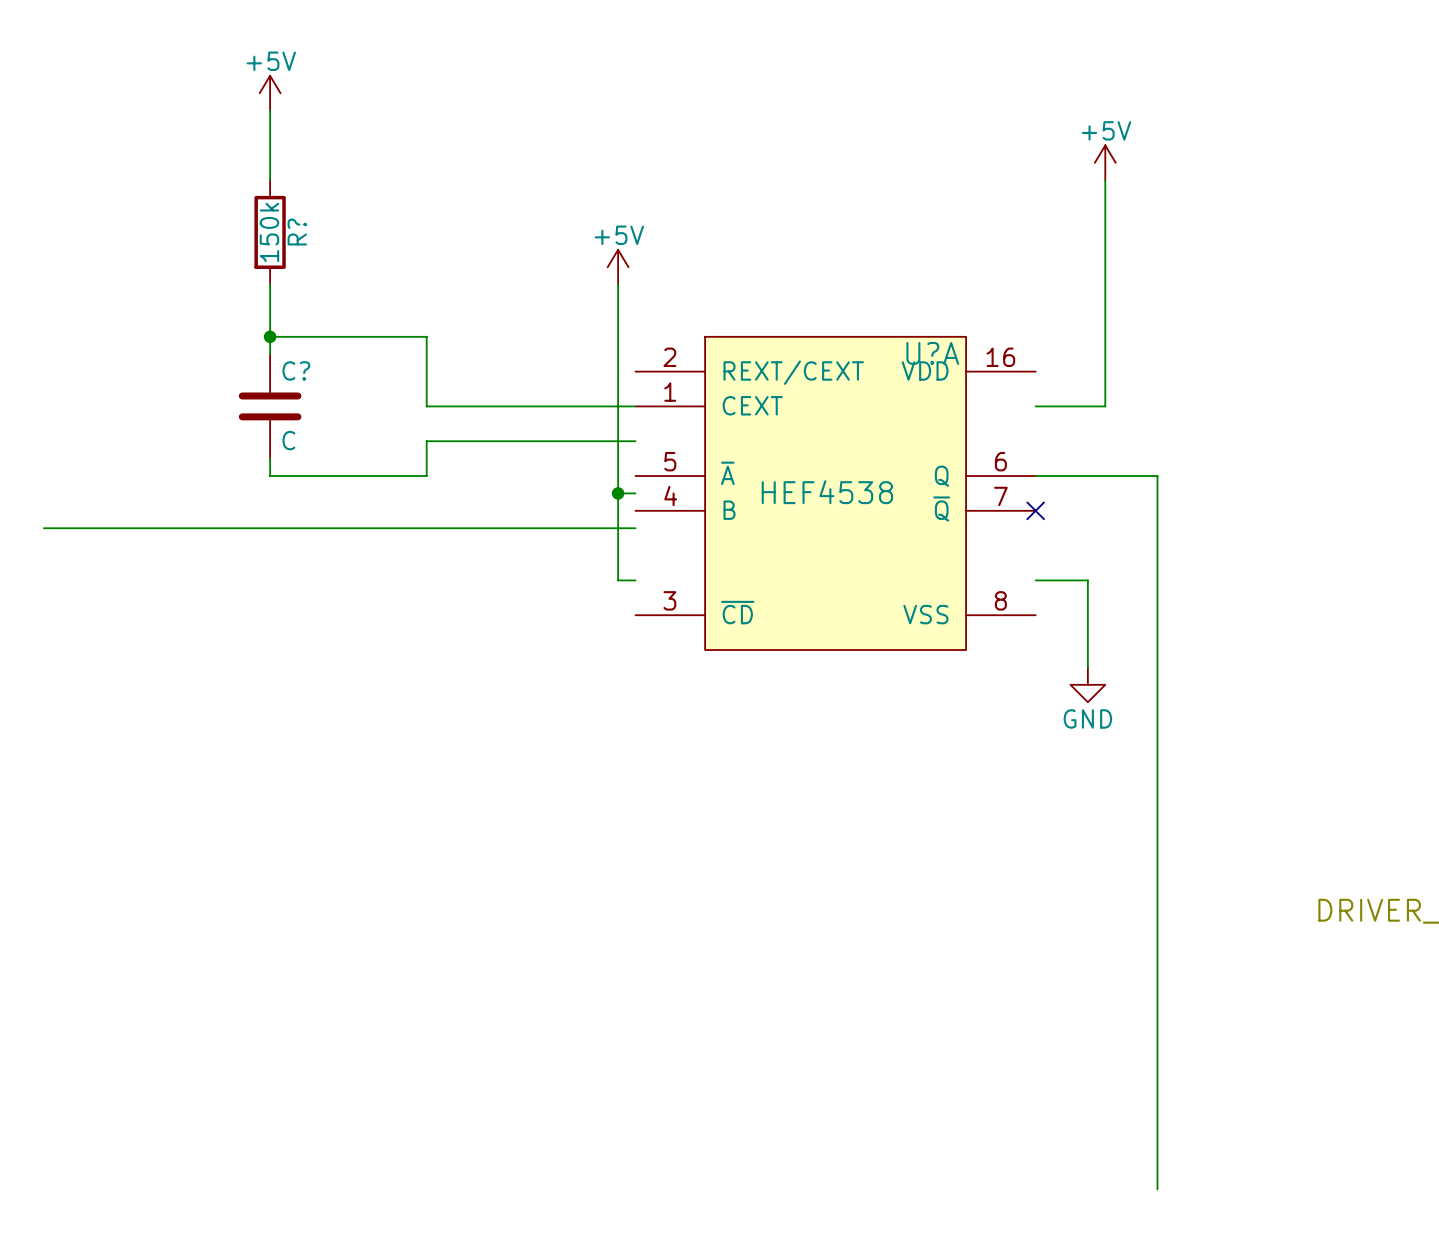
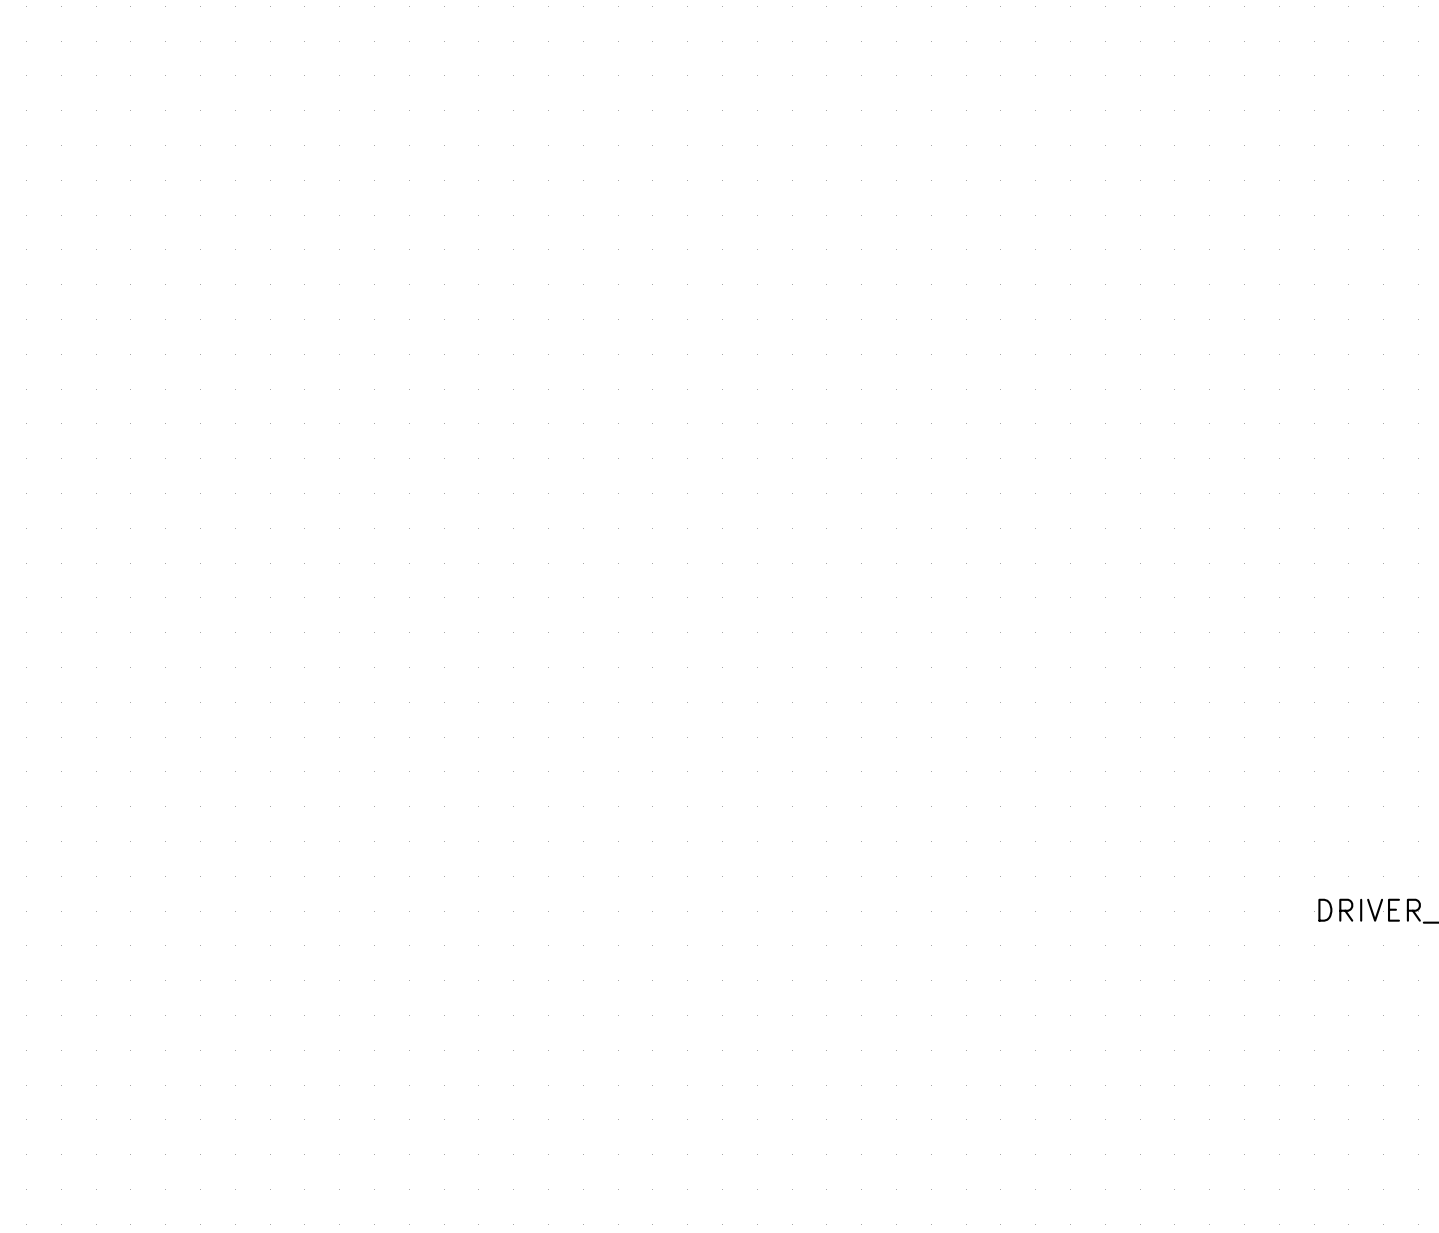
power symbol: +5V (270, 93) -> none
wire: (270, 110) (270, 180) -> none
power symbol: +5V (1105, 162) -> none
wire: (1105, 180) (1105, 406) (1035, 406) -> none
R?: 150k (270, 232) -> none
power symbol: +5V (618, 267) -> none
wire: (270, 284) (270, 354) -> none
wire: (618, 284) (618, 580) (635, 580) -> none
wire: (270, 336) (426, 336) (426, 406) (635, 406) -> none
junction: (270, 336) -> none
C?: C (270, 406) -> none
wire: (635, 441) (426, 441) (426, 476) (270, 476) (270, 458) -> none
wire: (1035, 476) (1157, 476) (1157, 1189) -> none
wire: (618, 493) (635, 493) -> none
junction: (618, 493) -> none
U?A: HEF4538 (835, 493) -> none
no-connect mark: (1035, 510) -> none
wire: (43, 528) (635, 528) -> none
wire: (1035, 580) (1087, 580) (1087, 667) -> none
power symbol: GND (1087, 684) -> none

